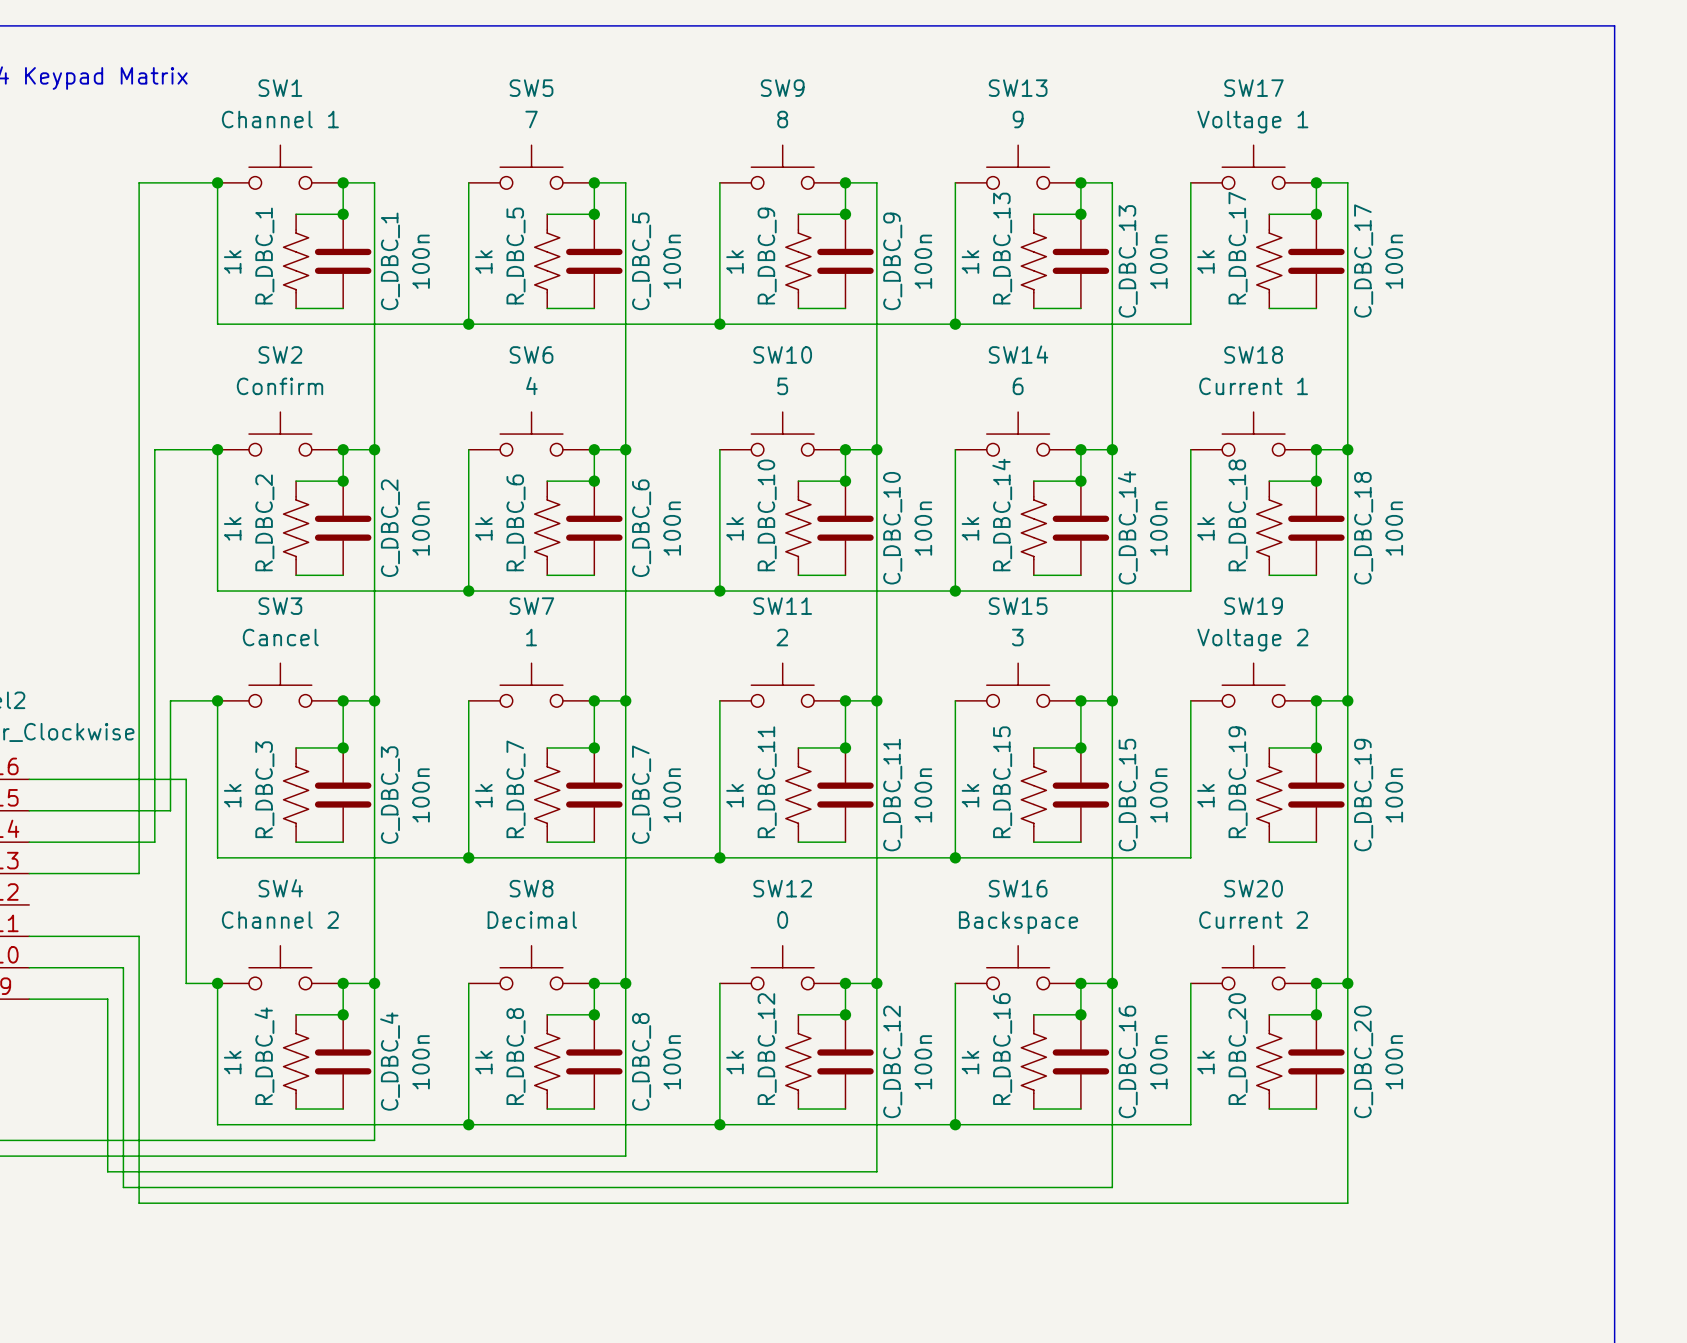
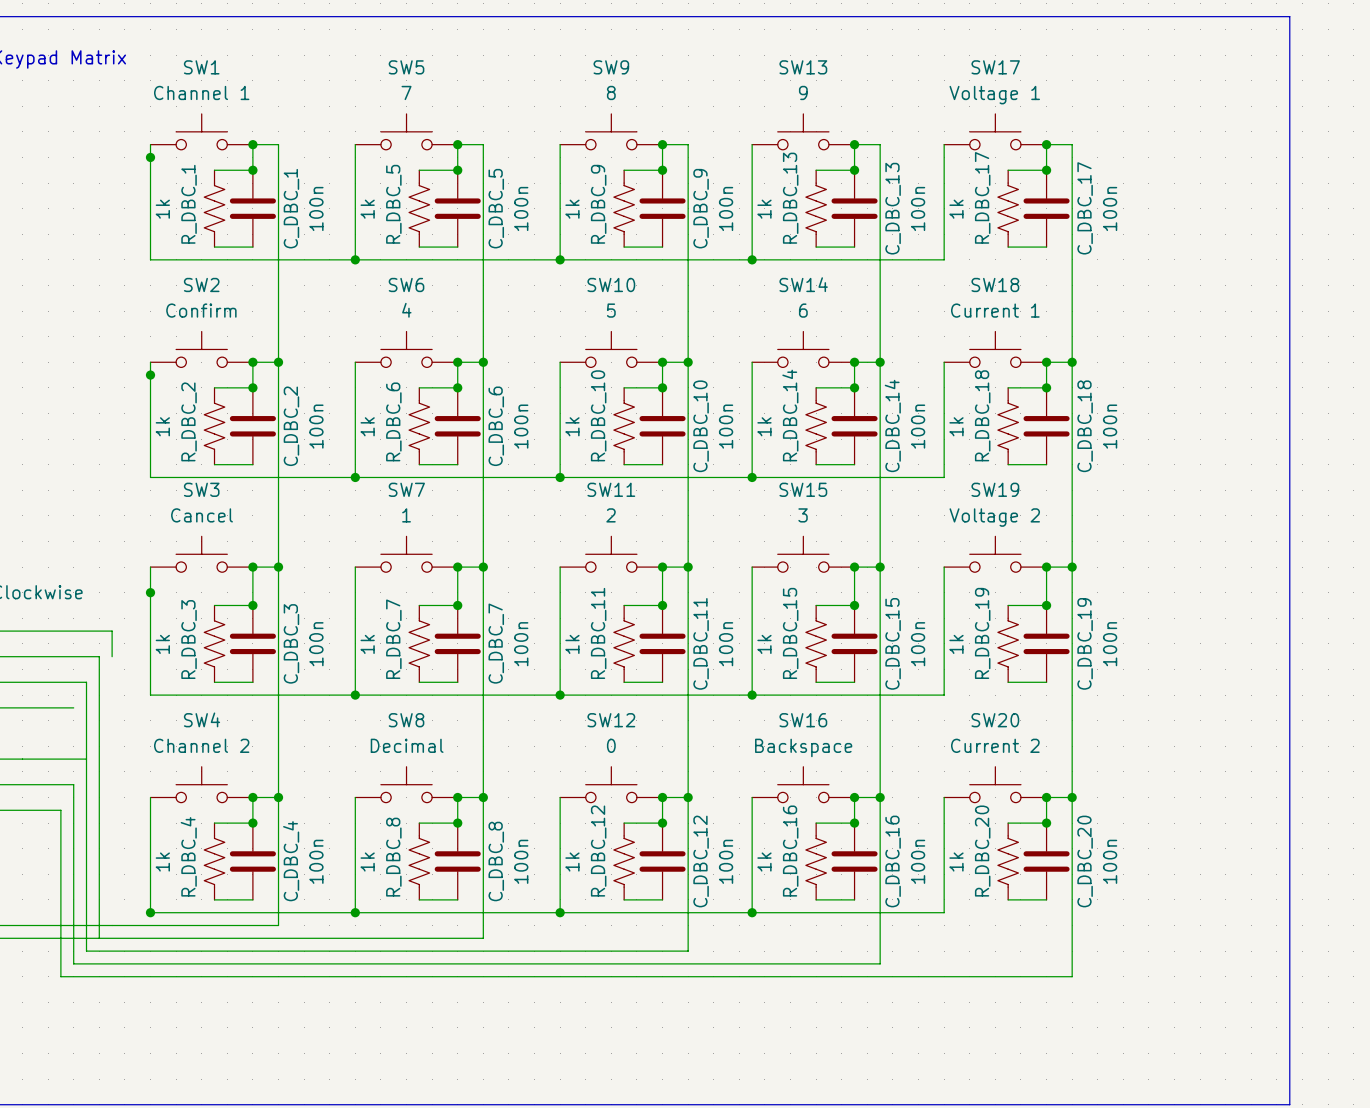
wire: (217, 182) (139, 182) (139, 842) (154, 842) -> (99, 938) (99, 682)
junction position: (217, 182) -> (150, 157)
wire: (217, 449) (154, 449) (154, 810) (170, 810) -> none
junction position: (217, 449) -> (150, 375)
wire: (217, 700) (170, 700) (170, 779) (186, 779) (186, 983) (217, 983) -> none
junction position: (217, 700) -> (150, 592)
wire: (123, 873) (139, 873) -> (86, 759) (86, 707)
junction: (217, 983) -> none
junction: none -> (150, 912)
wire: (107, 1171) (139, 1171) (139, 1203) -> (60, 951) (60, 976) (86, 976)

